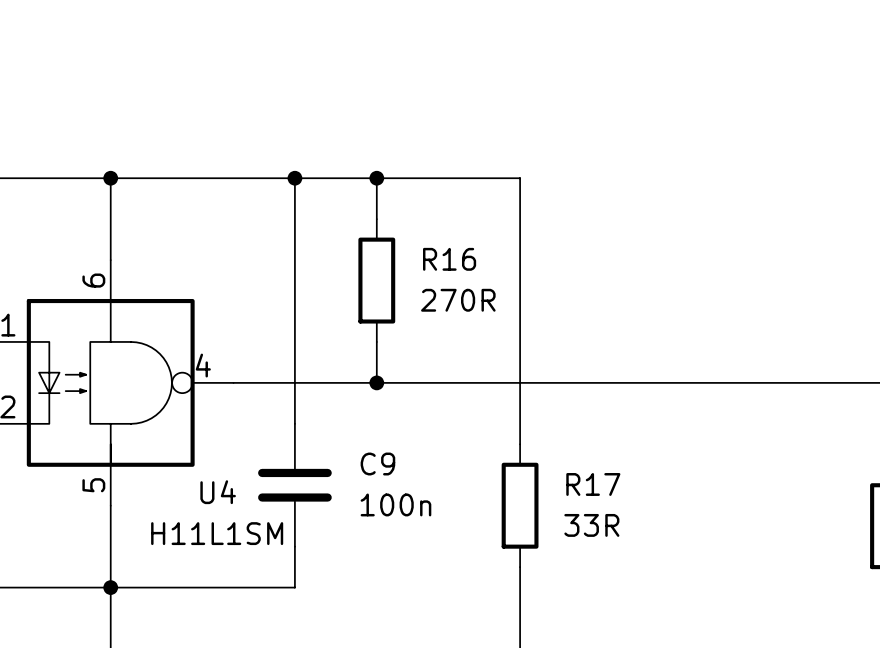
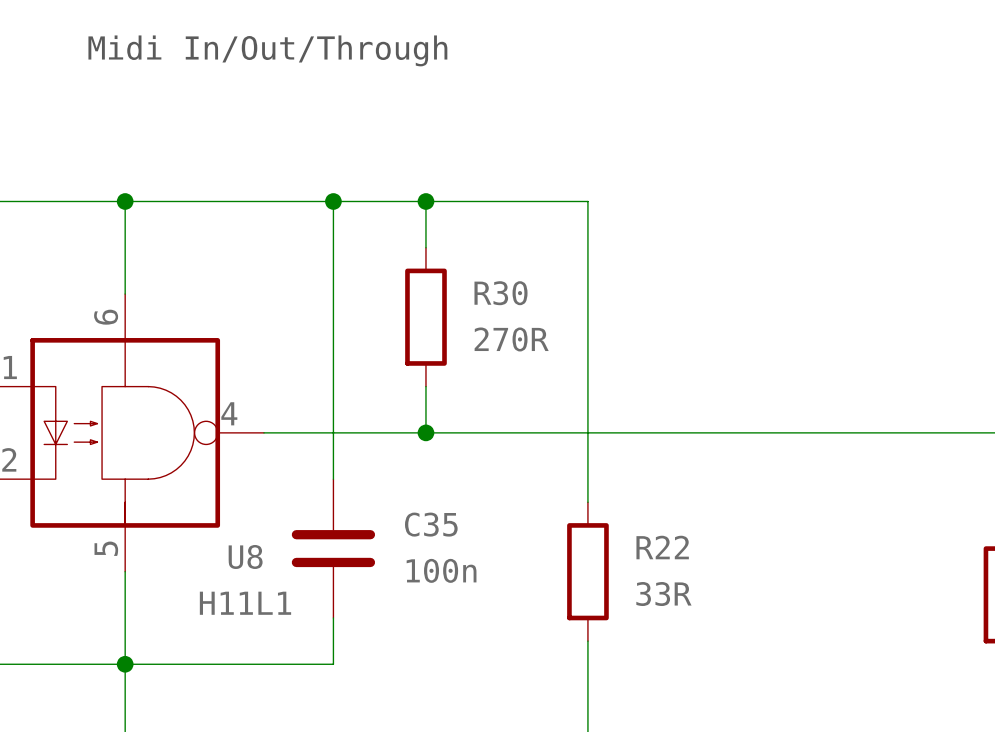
text: none -> Midi In/Out/Through (267, 50)
R16 name: R16 (449, 259) -> R30 (501, 293)
C9 name: C9 (377, 464) -> C35 (431, 524)
R17 name: R17 (593, 484) -> R22 (662, 547)
U4 name: U4 (218, 492) -> U8 (245, 556)
U4 value: H11L1SM (217, 533) -> H11L1 (245, 603)

